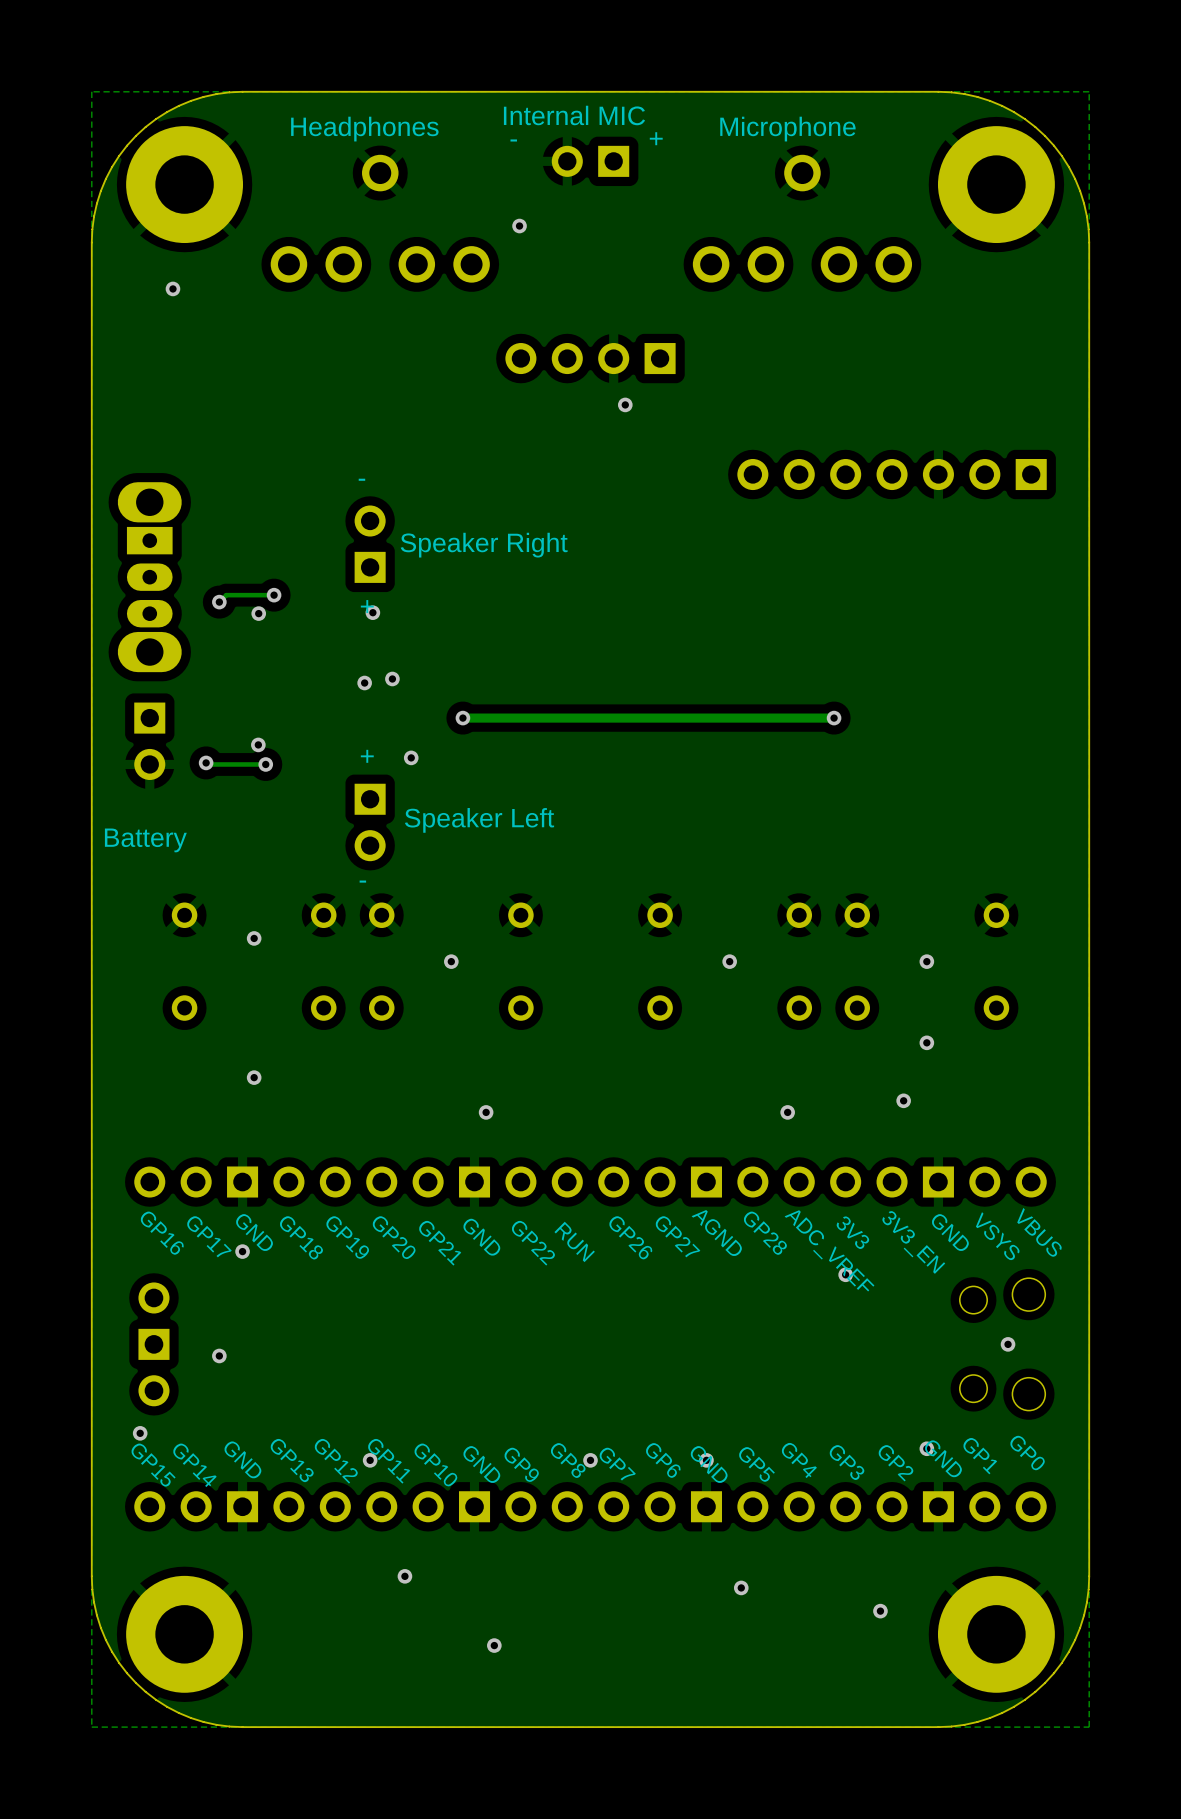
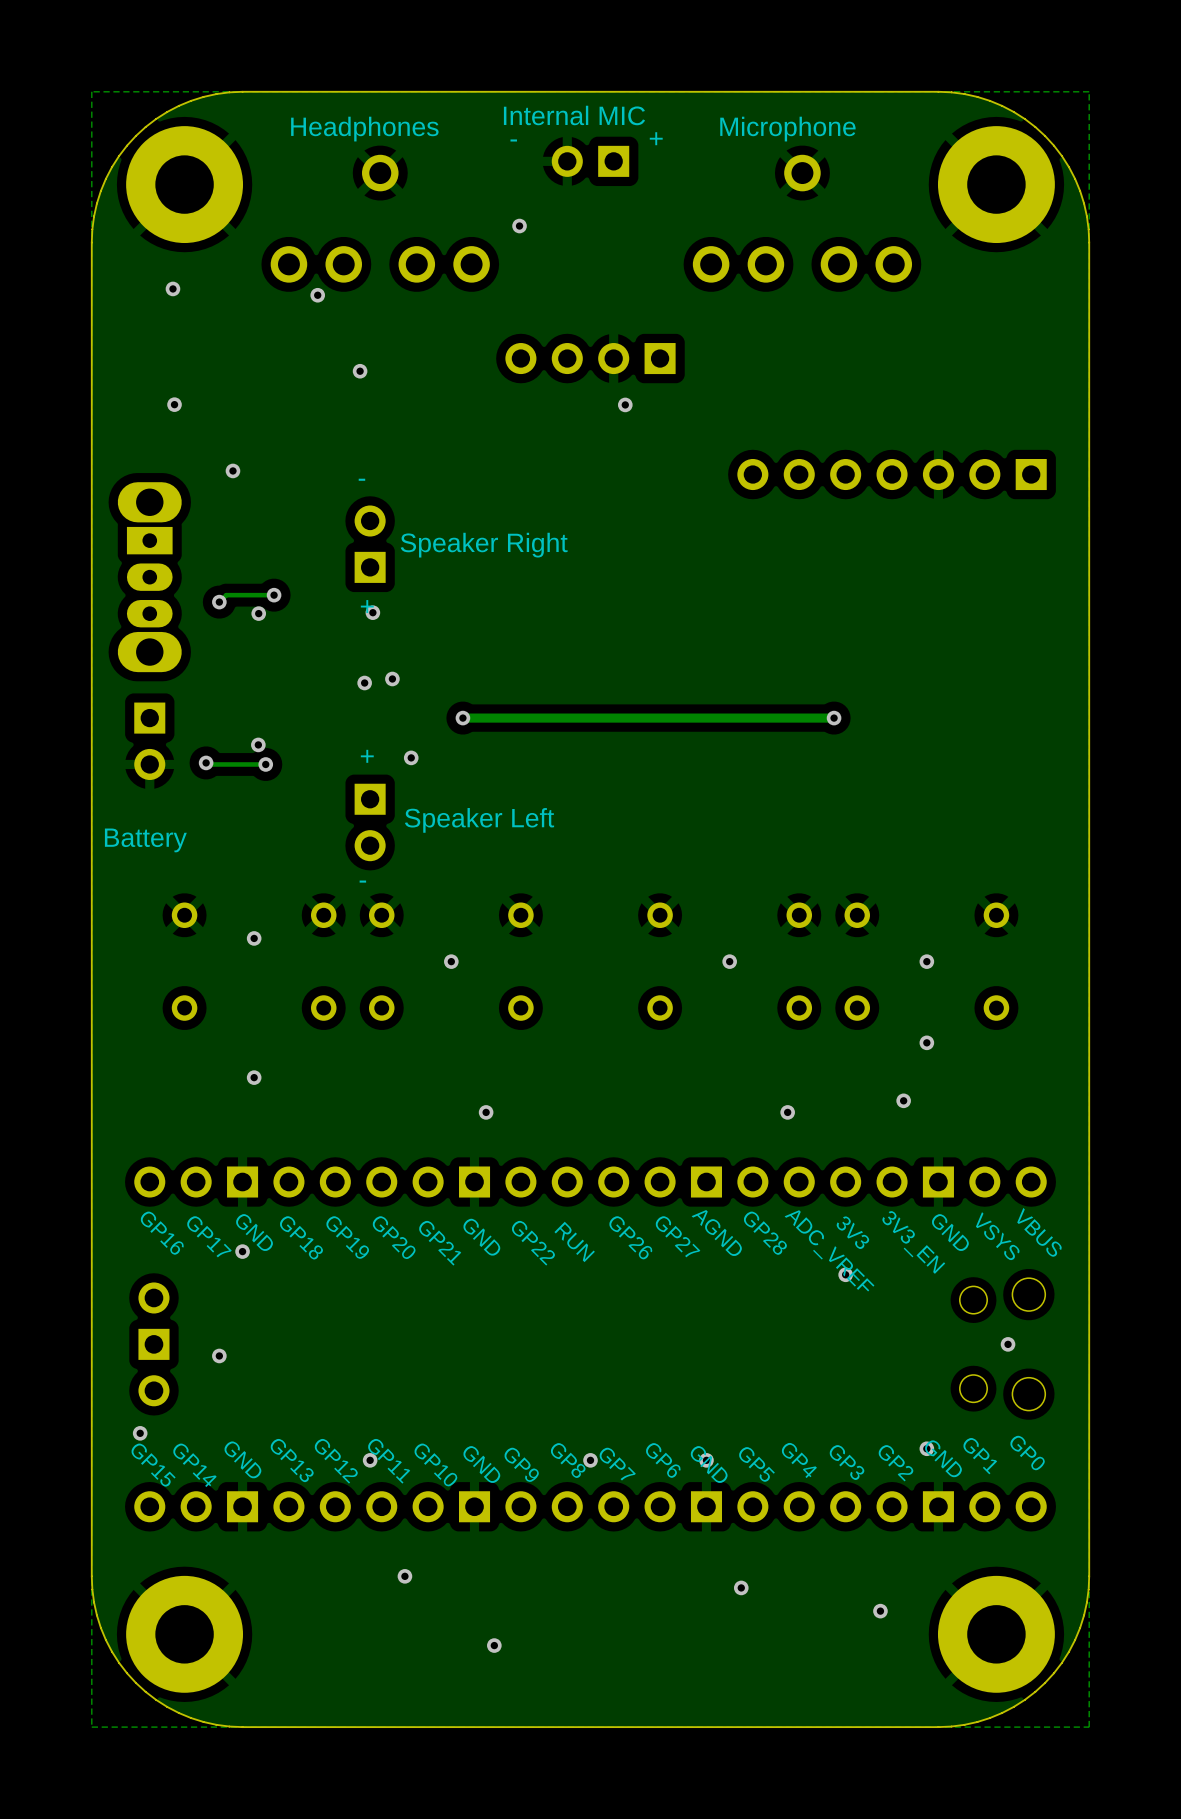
via: none -> (317, 295)
via: none -> (360, 371)
via: none -> (174, 404)
via: none -> (232, 470)

